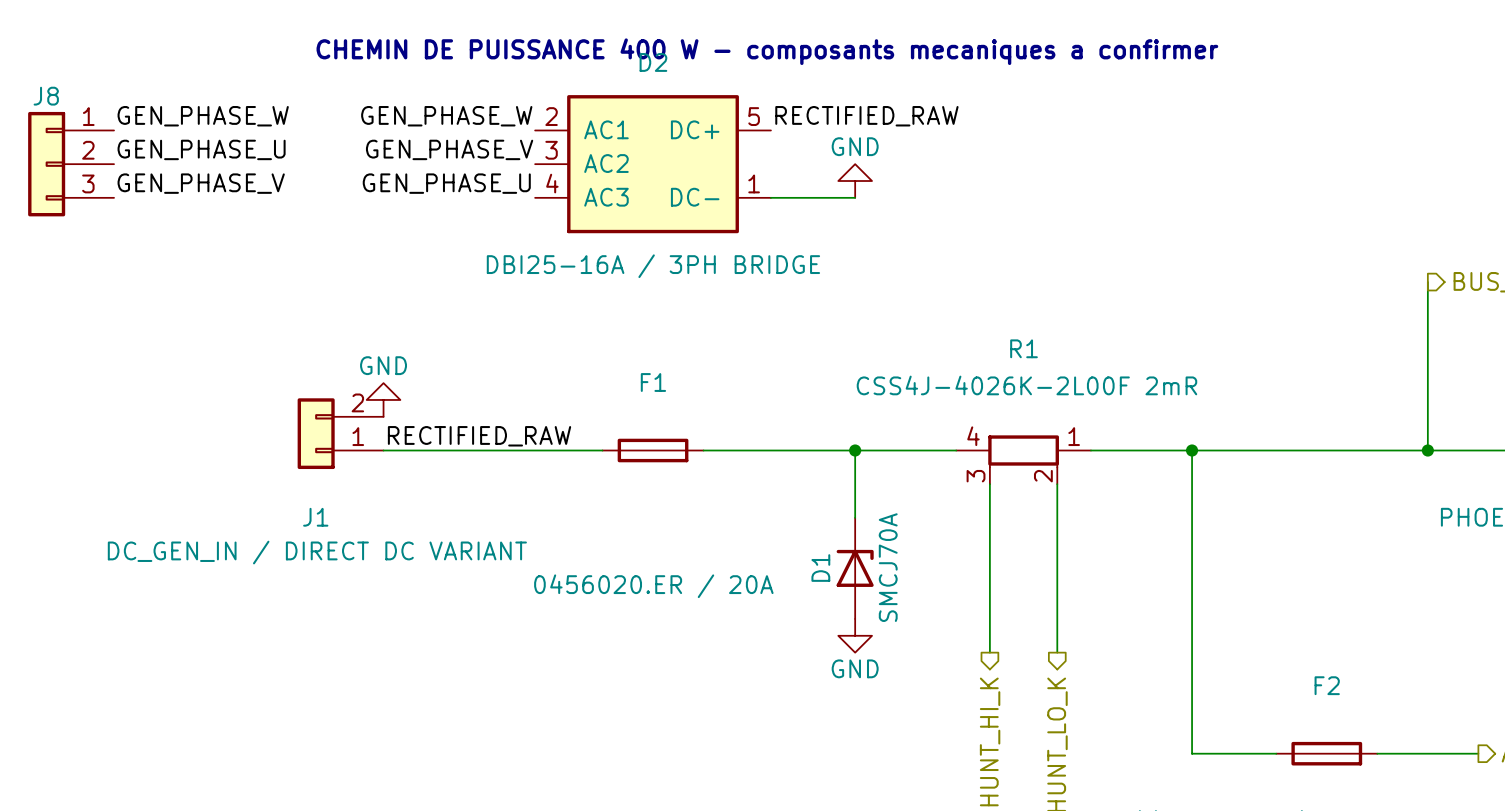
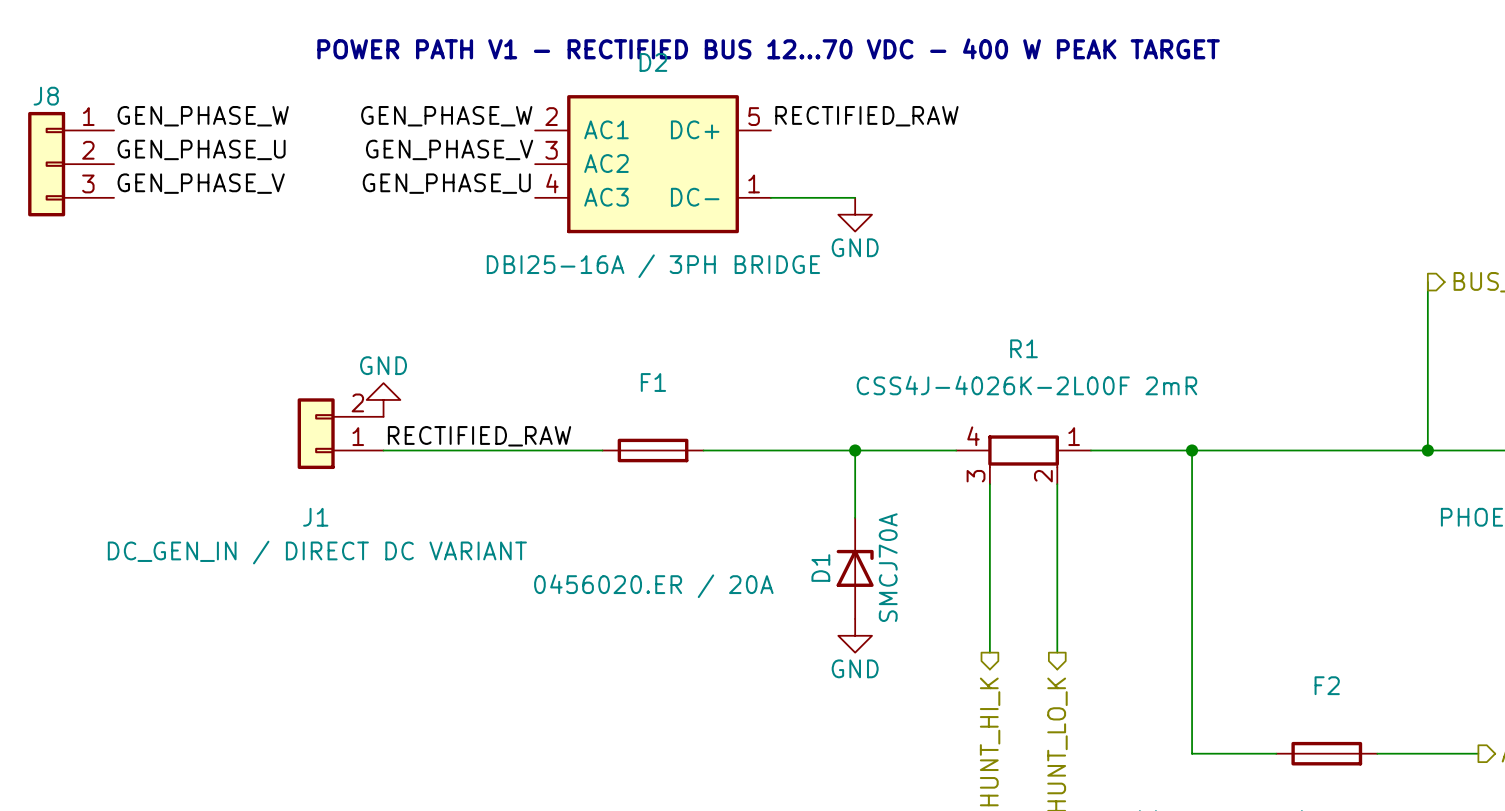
text: CHEMIN DE PUISSANCE 400 W - composants mecaniques a confirmer (767, 51) -> POWER PATH V1 - RECTIFIED BUS 12...70 VDC - 400 W PEAK TARGET (768, 48)
power symbol rotation: 0° (855, 181) -> 180° (855, 214)
power symbol position: GND (855, 181) -> GND (855, 214)

